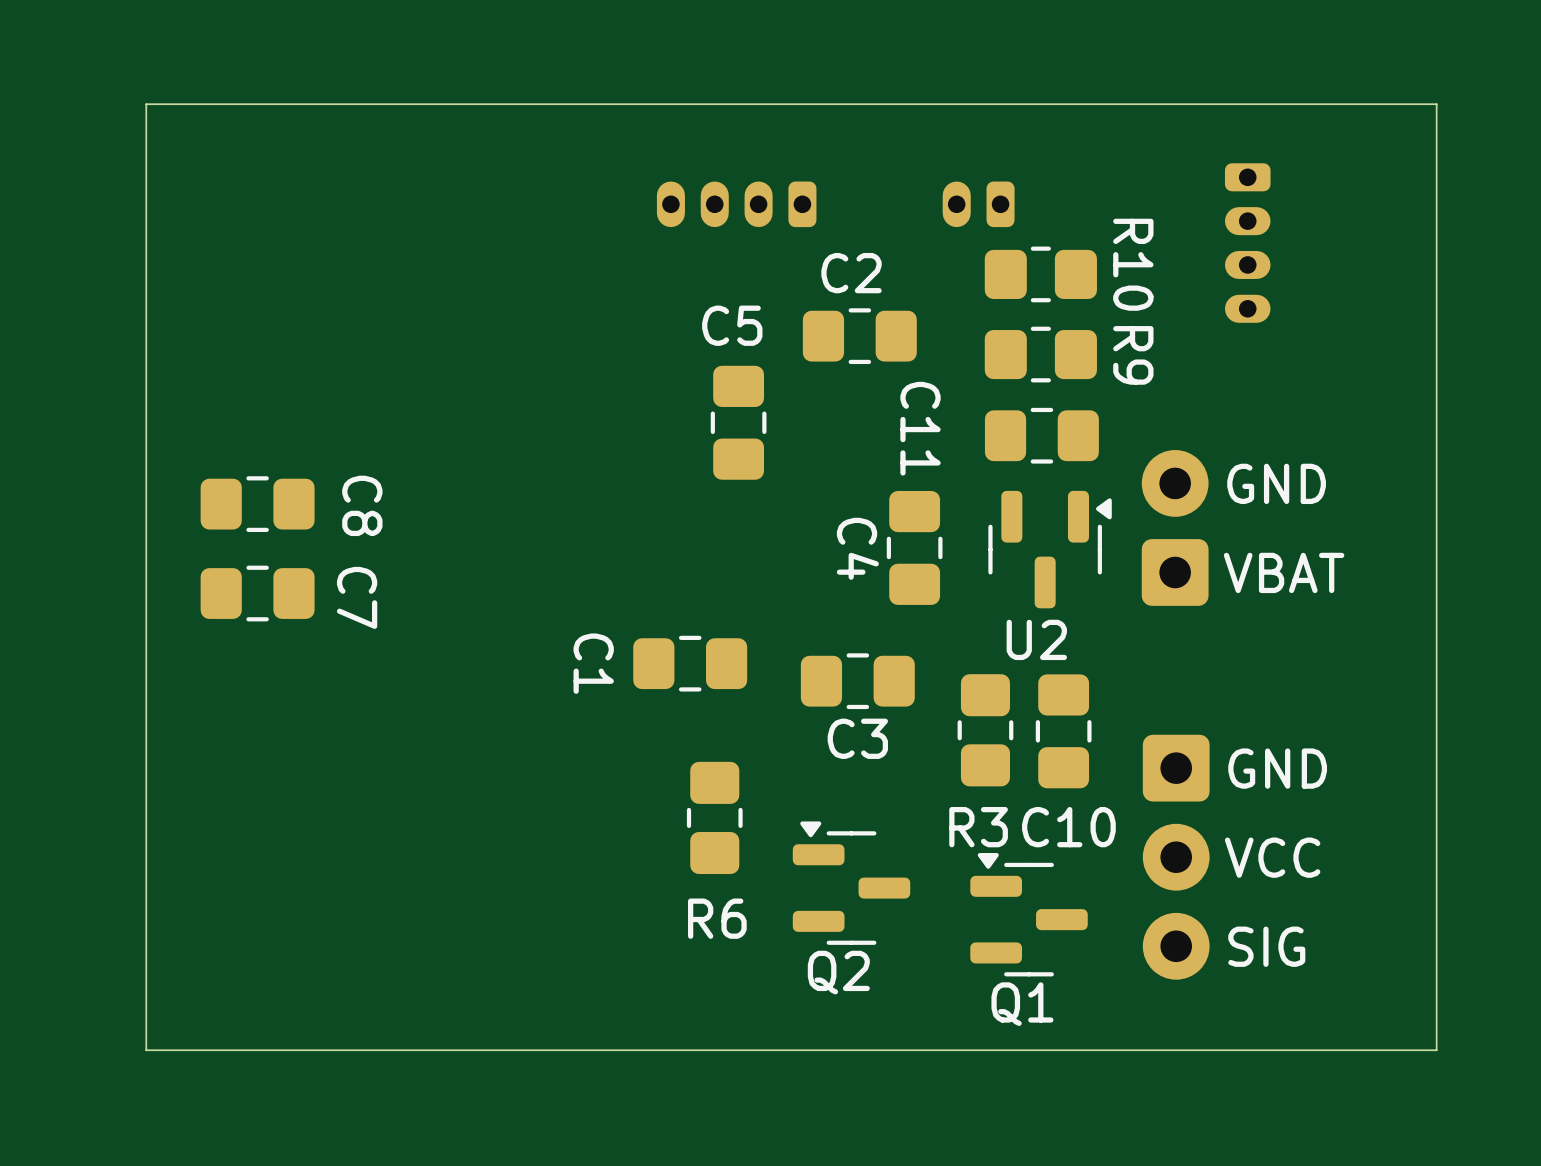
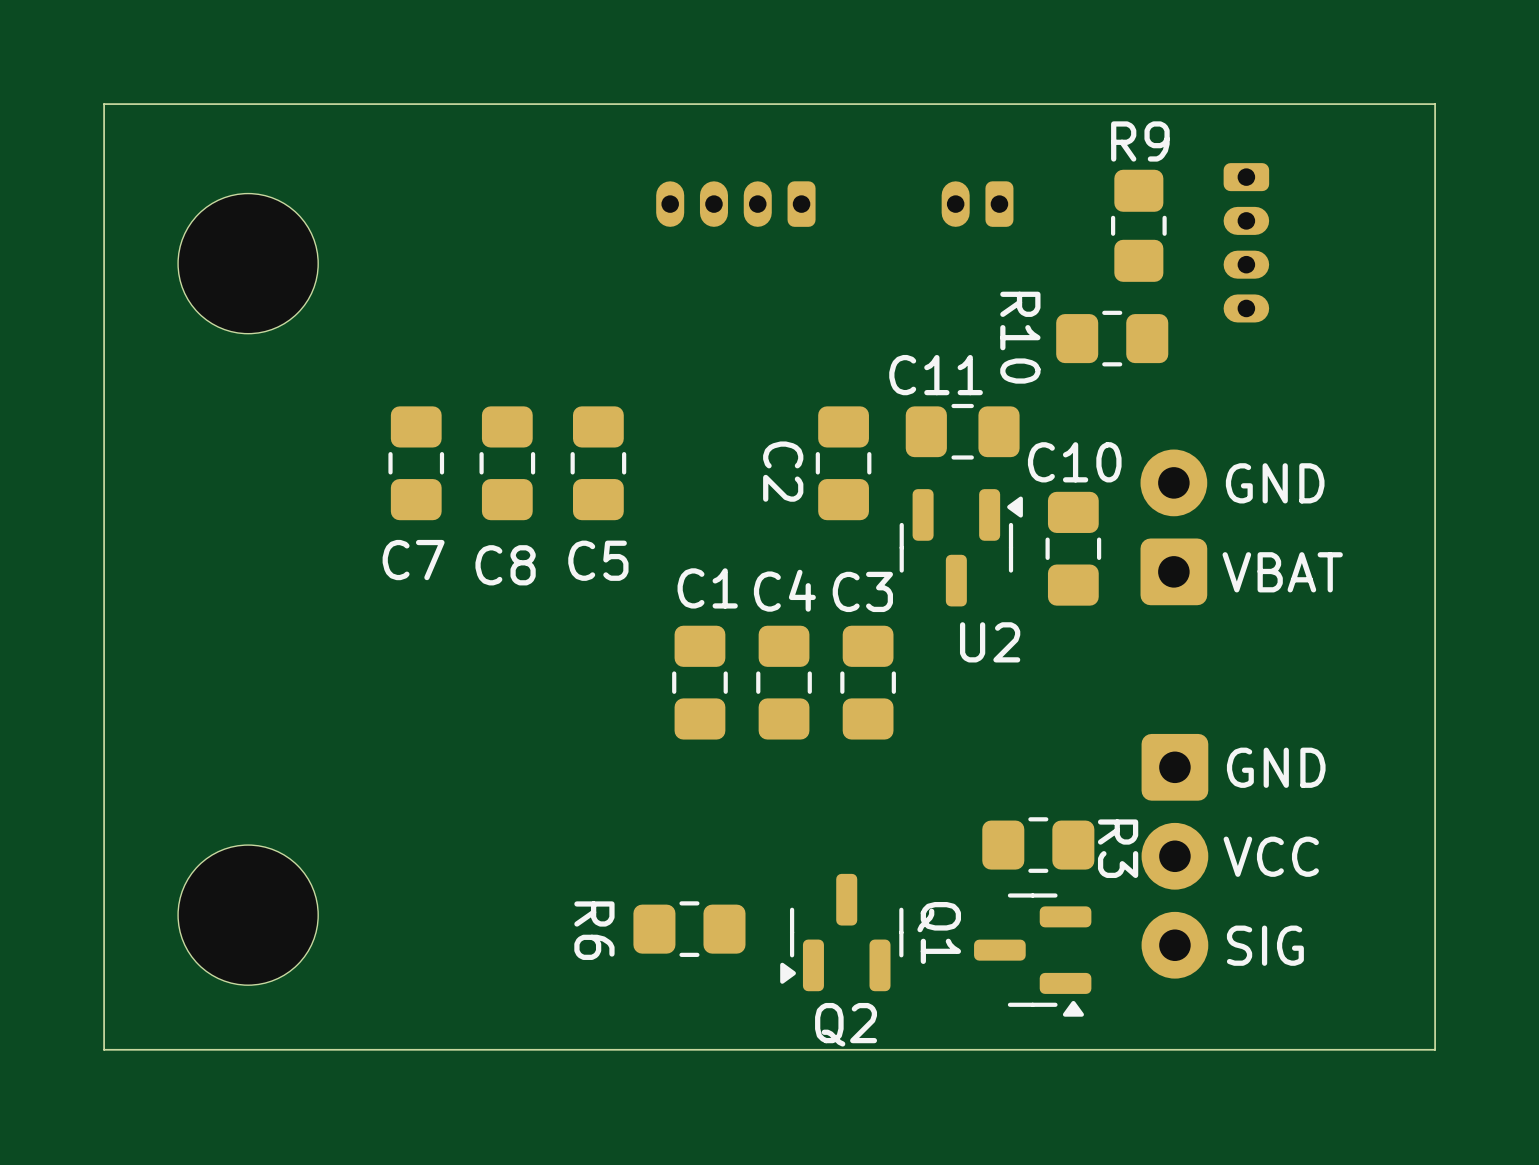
board edge: (146, 104) (146, 1050) (1436, 1050) -> (146, 104) (104, 104) (104, 1049) (1435, 1049)
part: none -> (248, 263)
R10 name position: R10 (1133, 264) -> R10 (1020, 337)
C2 name position: C2 (851, 273) -> C2 (783, 471)
R10 position: (1040, 274) -> (1112, 338)
C5 name position: C5 (732, 325) -> C5 (598, 560)
C2 rotation: 0° (859, 336) -> 90° clockwise (843, 463)
C2 position: (859, 336) -> (843, 463)
R9 rotation: 0° (1040, 354) -> 90° clockwise (1138, 225)
R9 position: (1040, 354) -> (1138, 225)
R9 name position: R9 (1133, 355) -> R9 (1140, 141)
C5 position: (738, 422) -> (598, 463)
C11 name rotation: 0° (920, 428) -> 90° counterclockwise (936, 375)
C11 position: (1041, 435) -> (962, 431)
C8 rotation: 0° (257, 504) -> 90° clockwise (507, 463)
C8 position: (257, 504) -> (507, 463)
C4 position: (914, 547) -> (784, 682)
C4 name rotation: 0° (857, 548) -> 90° counterclockwise (784, 590)
U2 position: (1050, 549) -> (961, 547)
C7 rotation: 0° (257, 593) -> 90° clockwise (416, 463)
C7 position: (257, 593) -> (416, 463)
U2 name position: U2 (1036, 639) -> U2 (990, 642)
C1 rotation: 0° (690, 663) -> 90° clockwise (699, 682)
C3 rotation: 0° (857, 681) -> 90° clockwise (868, 682)
R3 rotation: 0° (985, 730) -> 90° clockwise (1038, 845)
R3 position: (985, 730) -> (1038, 845)
C10 position: (1063, 731) -> (1073, 548)
C3 name position: C3 (857, 738) -> C3 (862, 591)
R6 rotation: 0° (714, 817) -> 90° clockwise (689, 929)
R6 position: (714, 817) -> (689, 929)
R3 name position: R3 (978, 827) -> R3 (1118, 848)
C10 name position: C10 (1068, 827) -> C10 (1074, 462)
Q2 rotation: 0° (851, 883) -> 90° counterclockwise (841, 932)
Q1 rotation: 0° (1029, 914) -> 180° (1032, 955)
part: none -> (248, 915)
Q1 name position: Q1 (1022, 1004) -> Q1 (939, 932)

